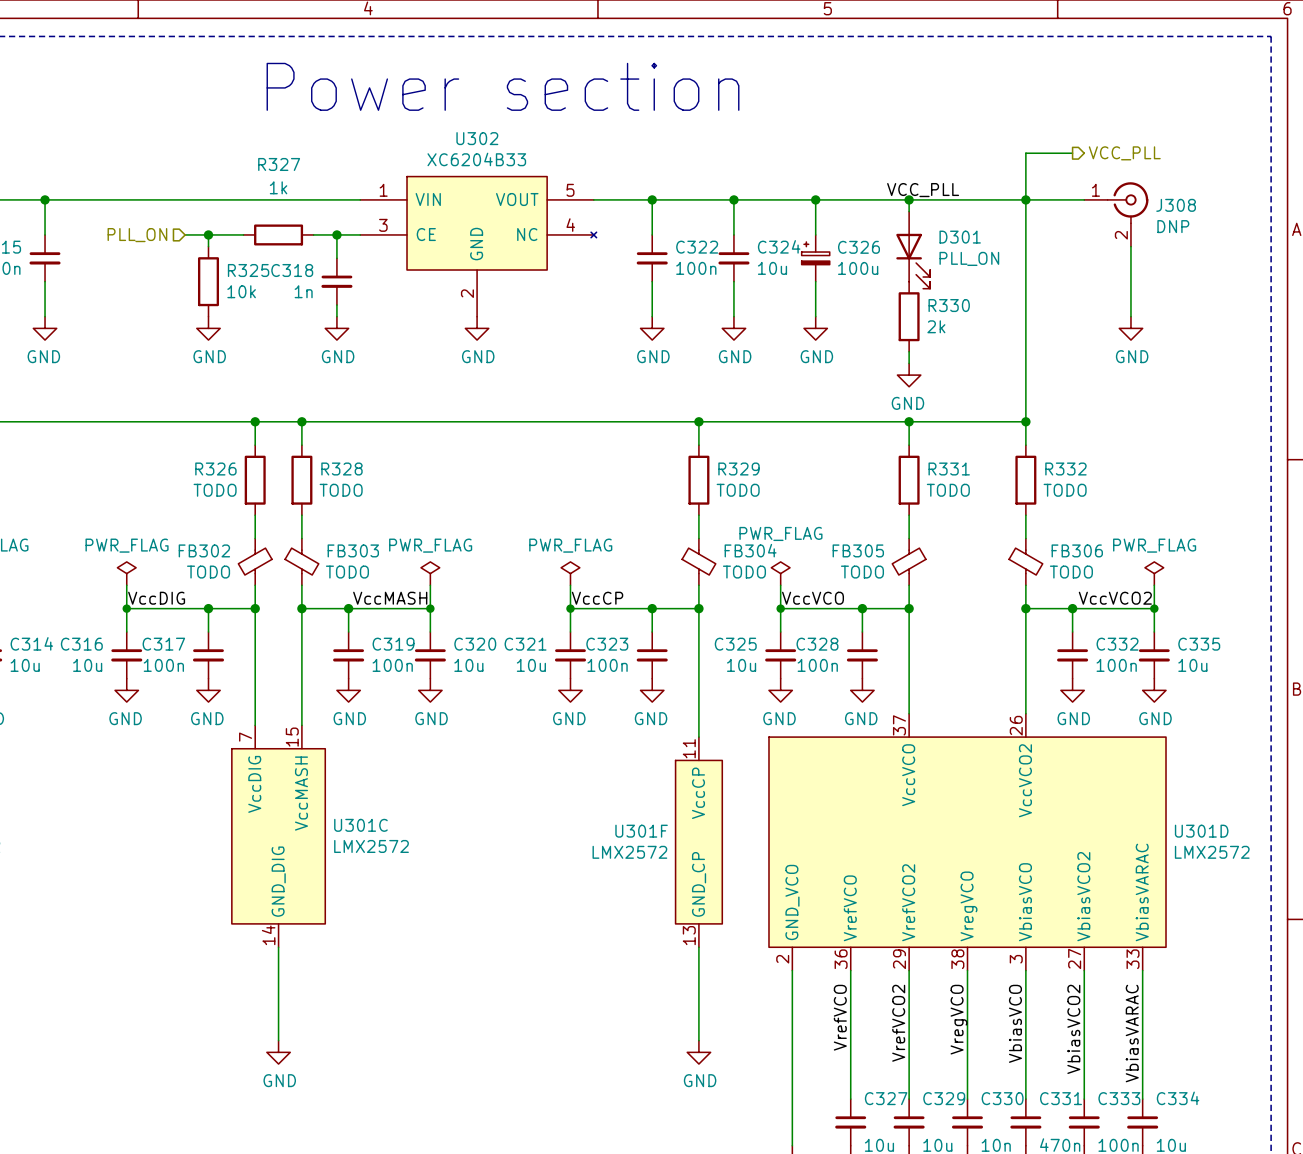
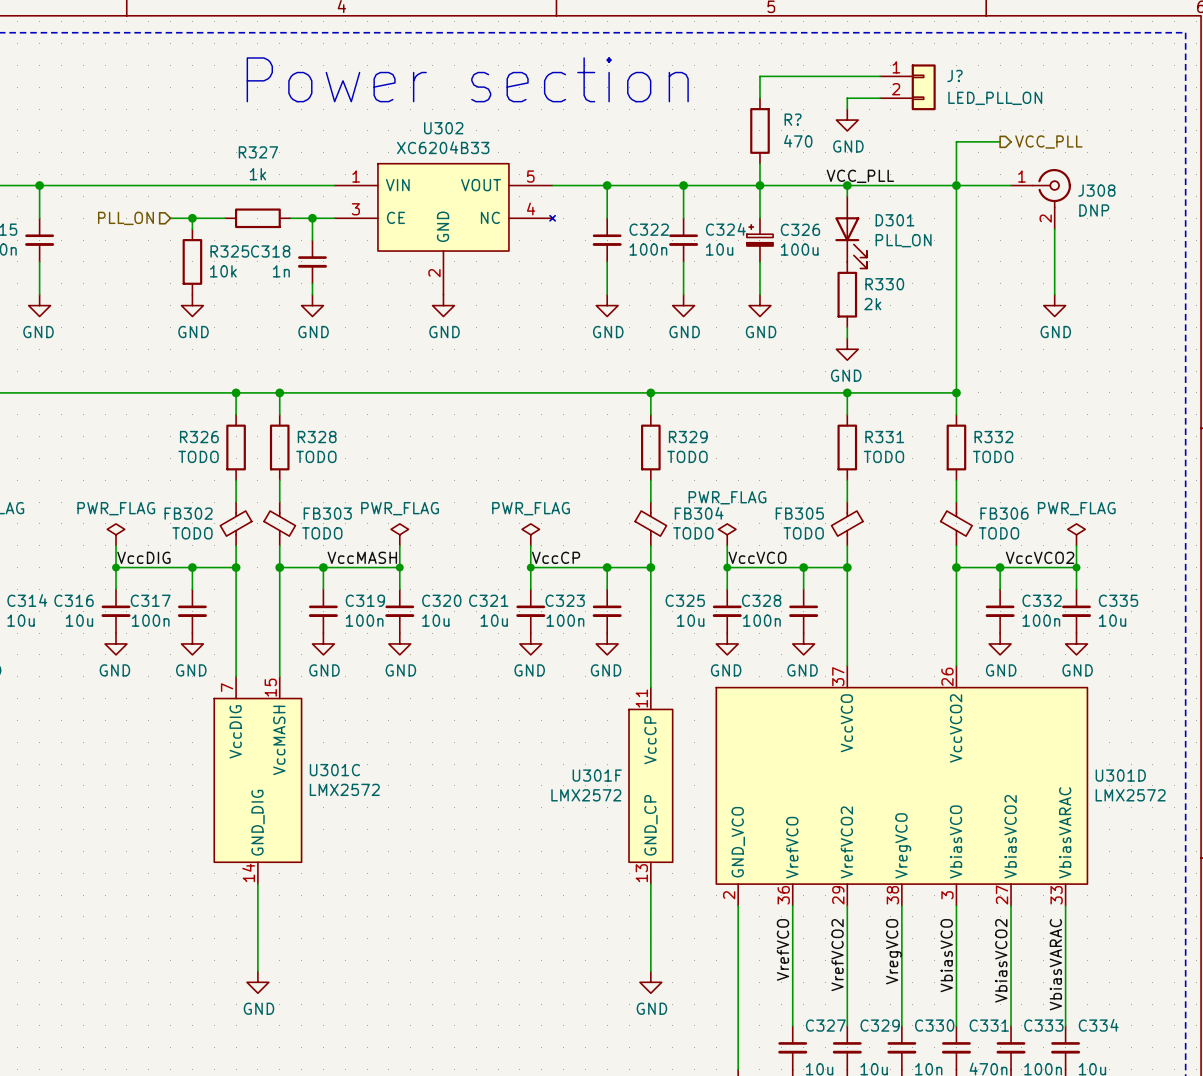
wire: none -> (880, 76) (759, 76) (759, 98)
J?: none -> LED_PLL_ON (907, 87)
wire: none -> (880, 98) (847, 98) (847, 109)
power symbol: none -> GND (847, 120)
R?: none -> 470 (759, 130)
wire: none -> (759, 163) (759, 185)

